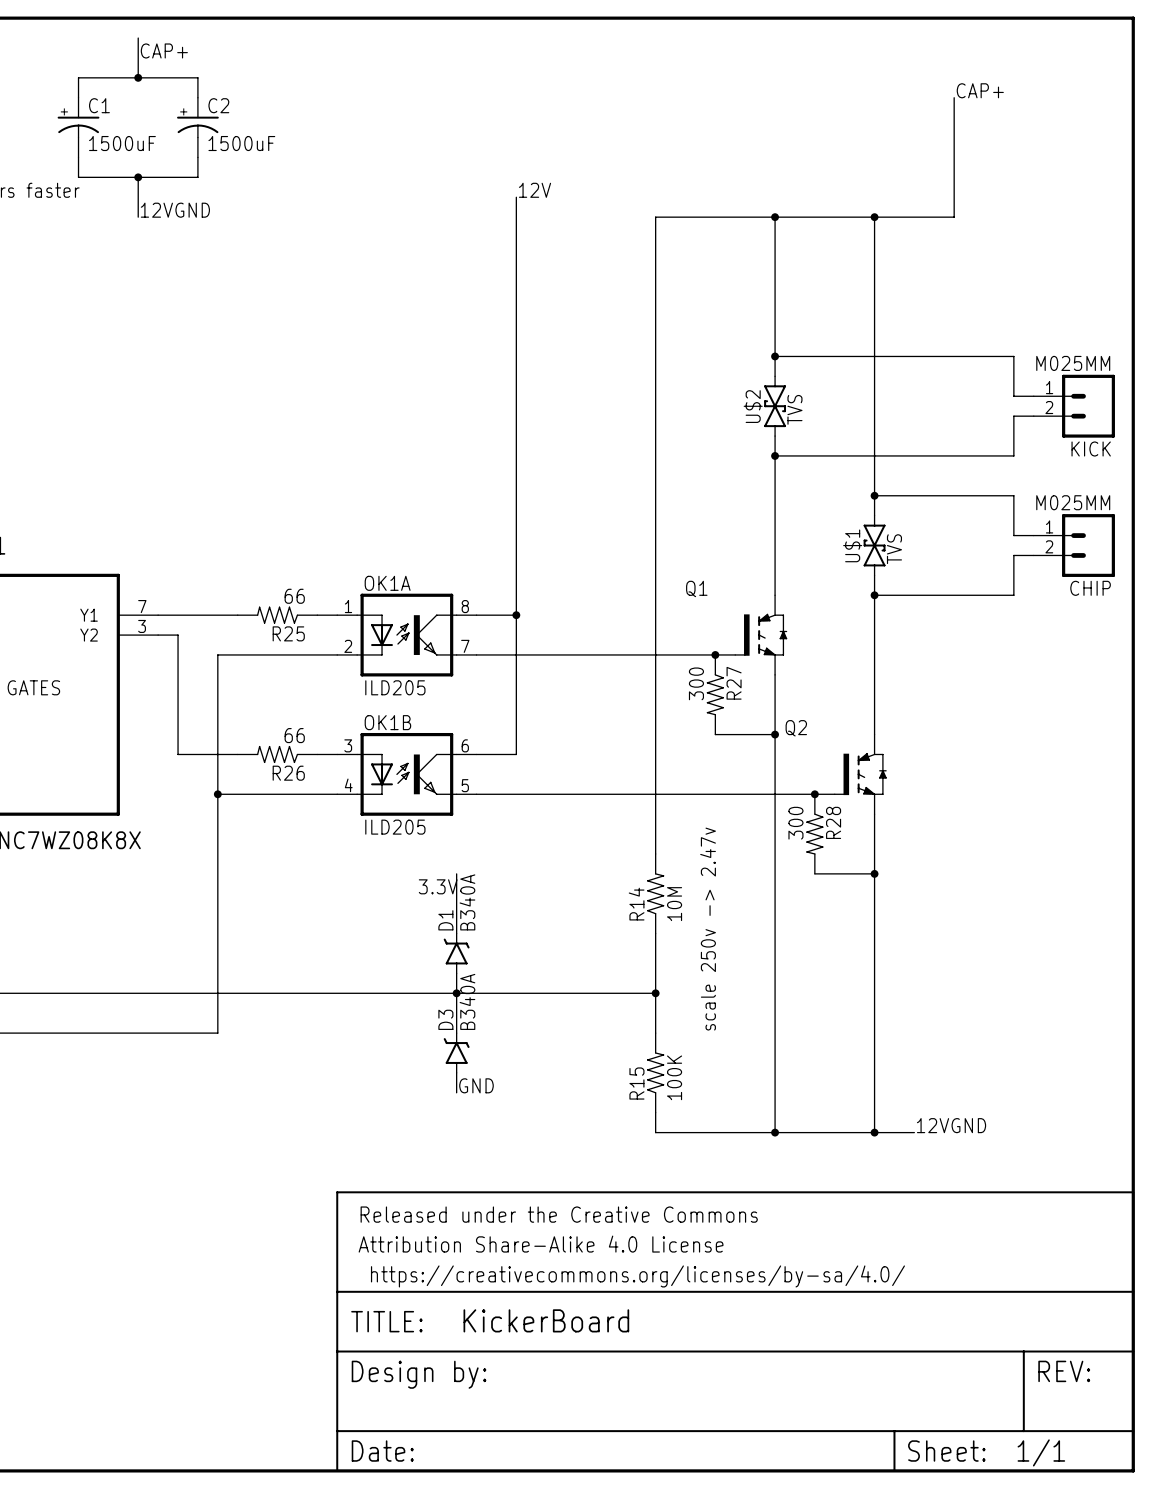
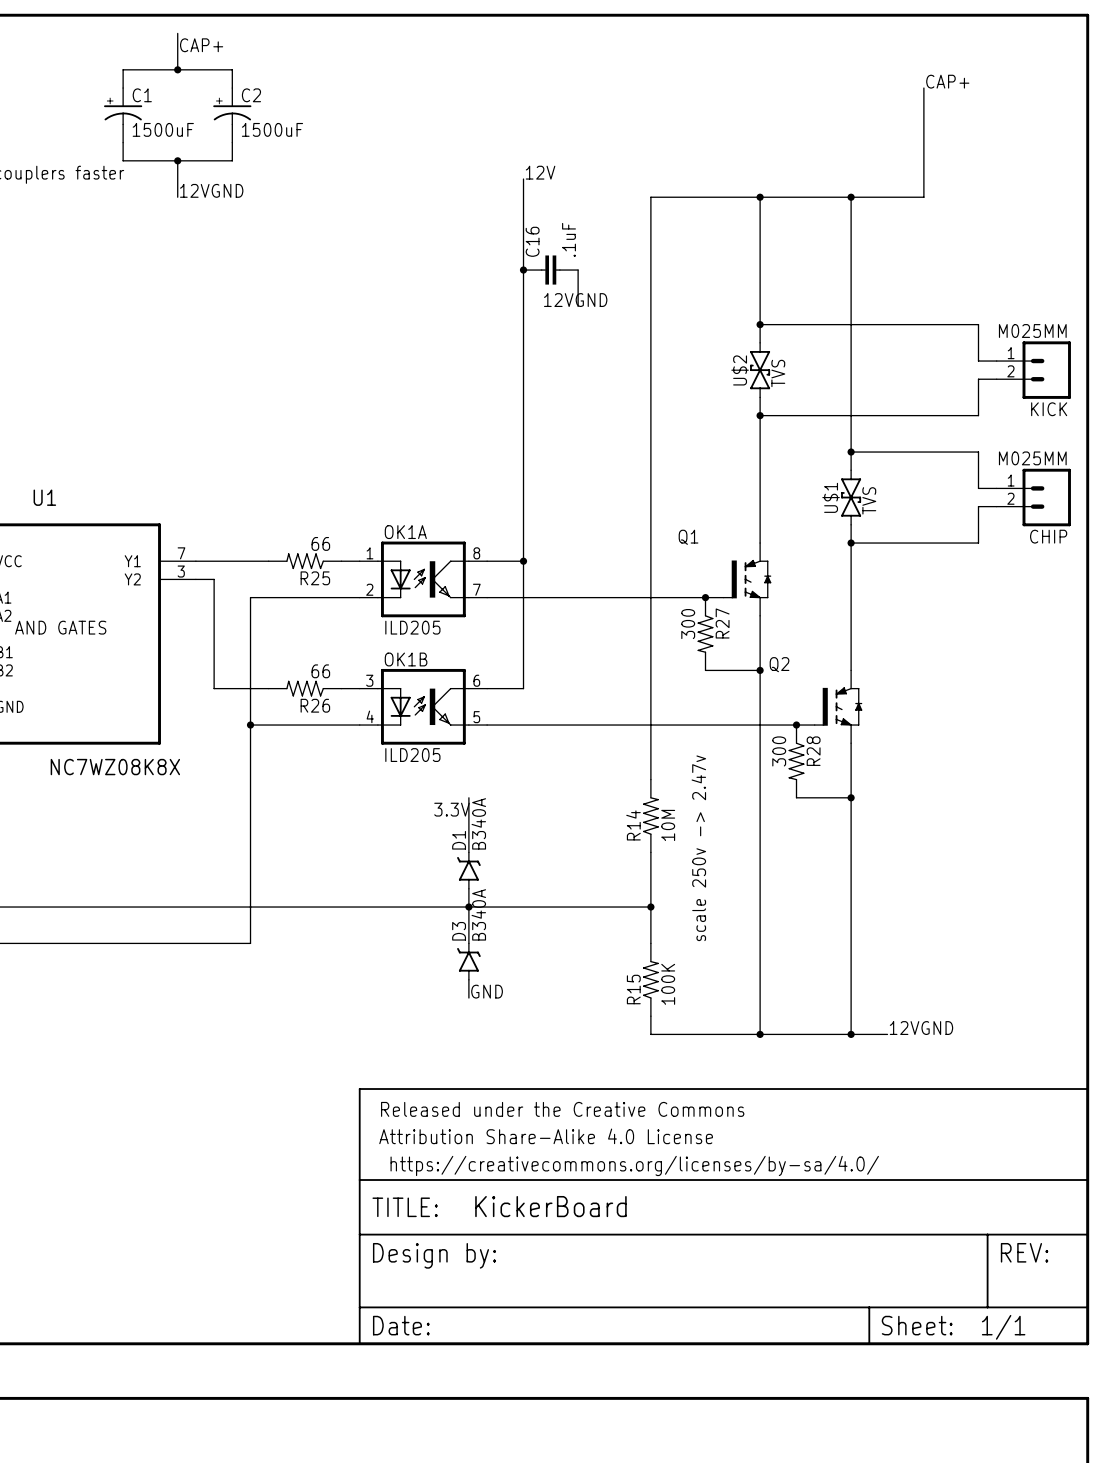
junction: none -> (523, 270)
C16: none -> .1uF (550, 270)
wire: none -> (578, 270) (578, 306)
label: none -> 12VGND (575, 300)

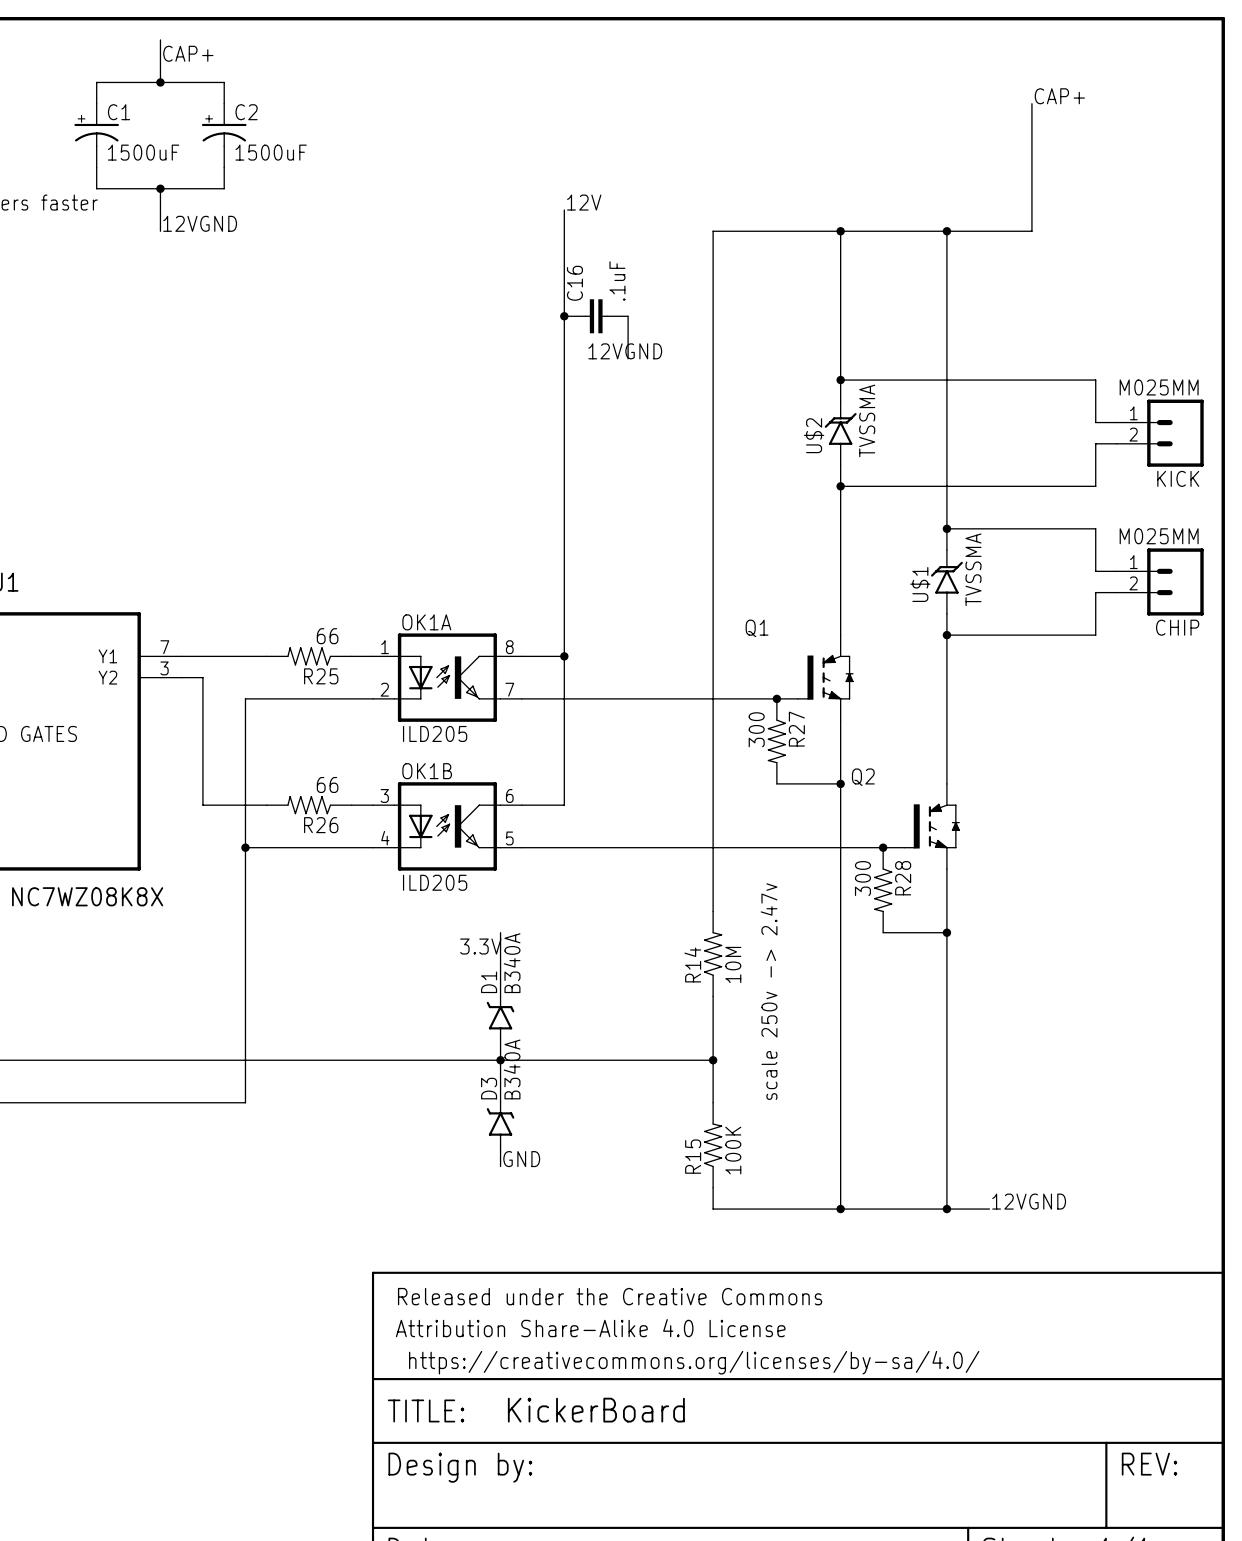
U$2 symbol: [750, 342, 771, 398] -> [824, 400, 857, 466]
U$2 value: TVS (778, 373) -> TVSSMA (867, 420)
U$1 symbol: [841, 469, 862, 526] -> [930, 549, 963, 615]
U$1 value: TVS (869, 500) -> TVSSMA (973, 569)

